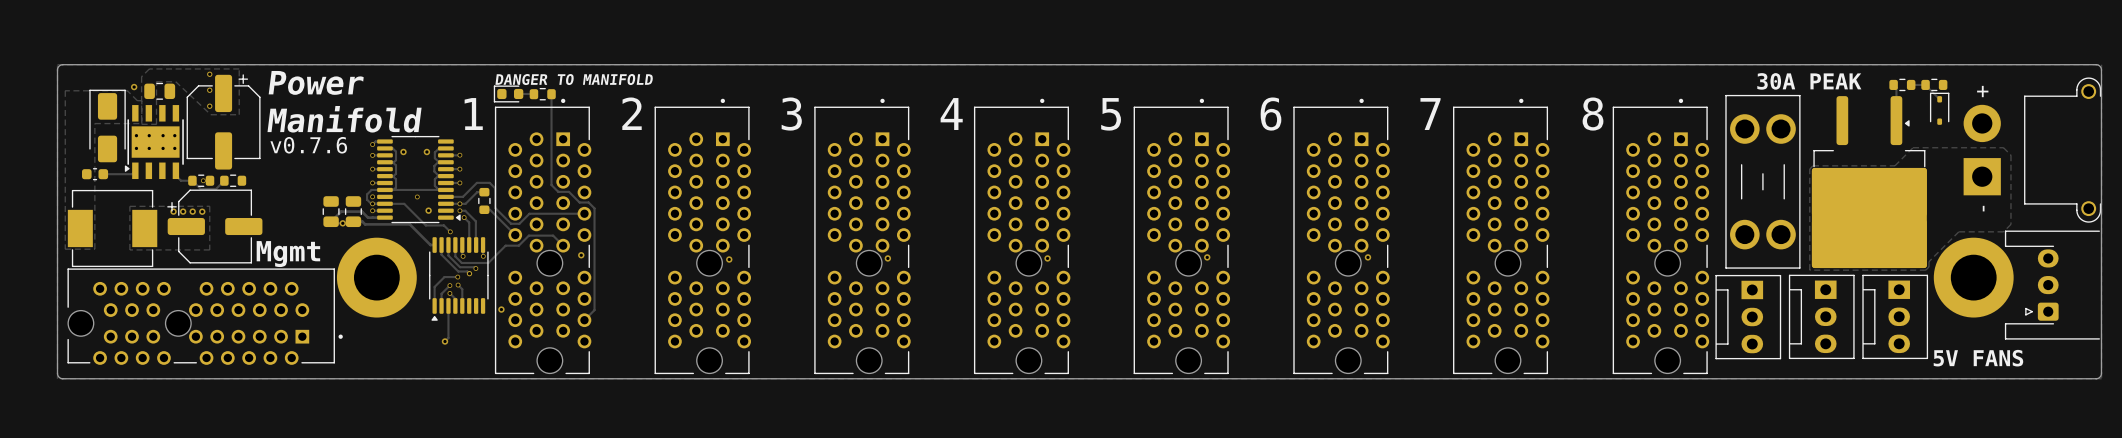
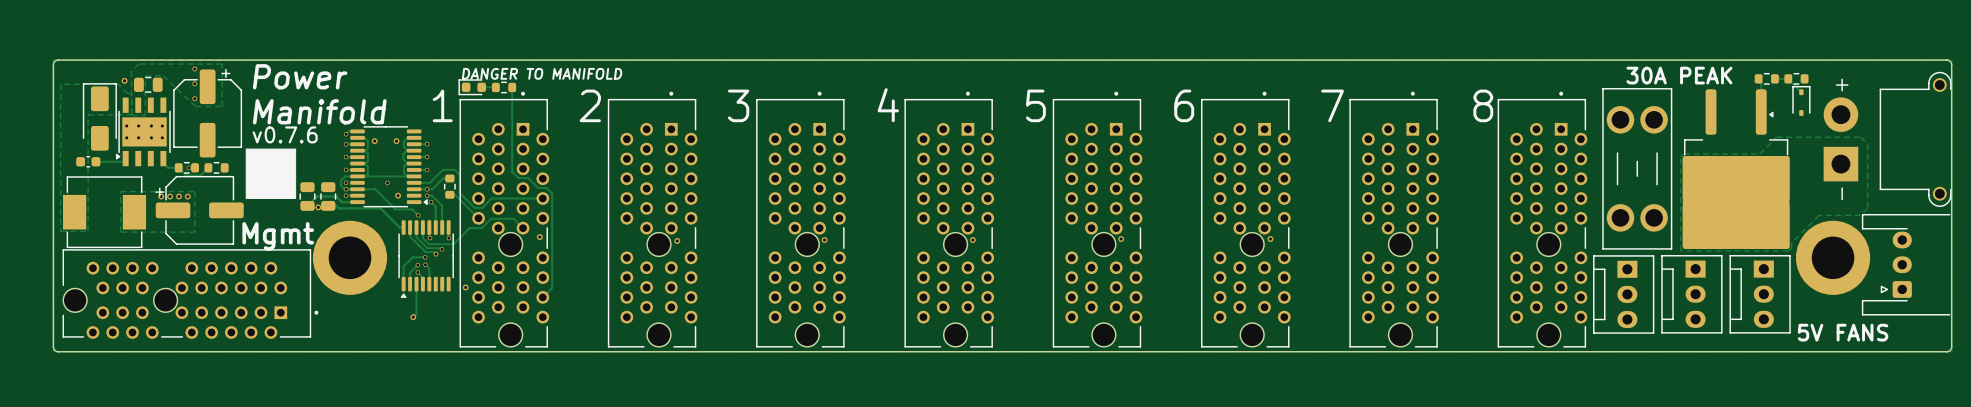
drawing: none -> [245, 148, 297, 200]

